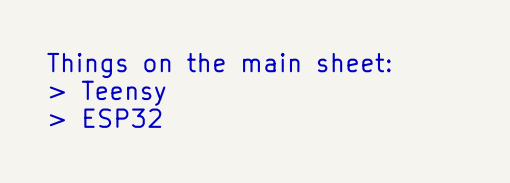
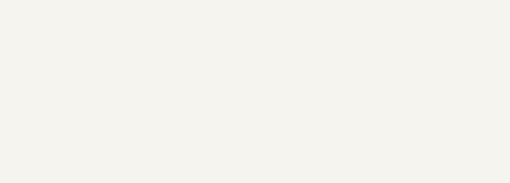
text: Things on the main sheet: (219, 65) -> none
text: > Teensy (107, 93) -> none
text: > ESP32 (105, 118) -> none

